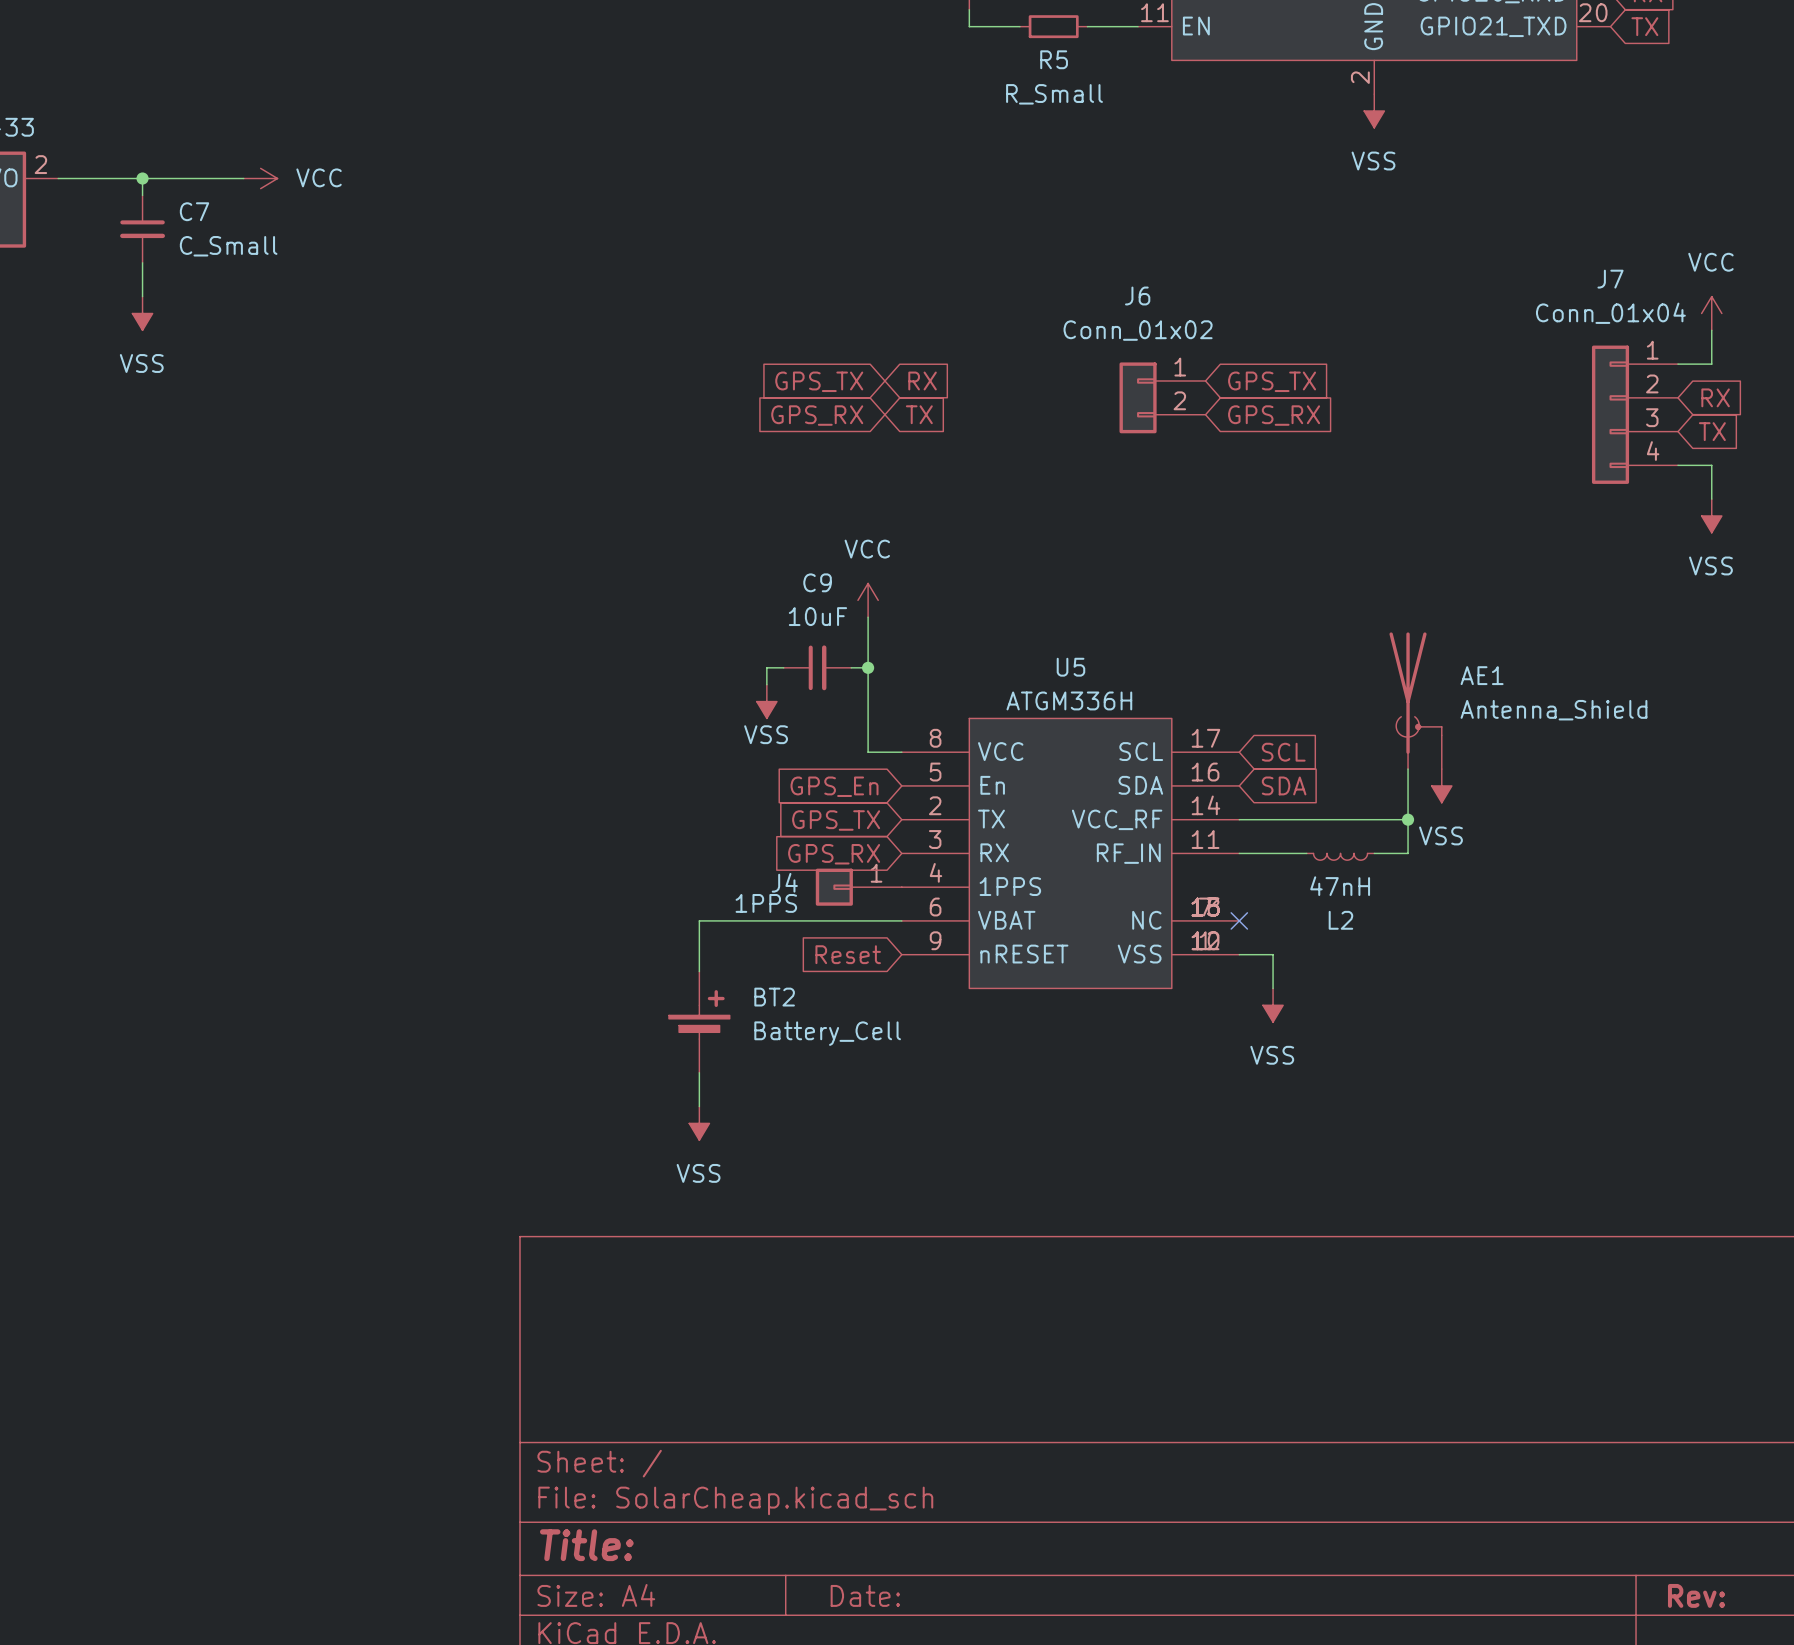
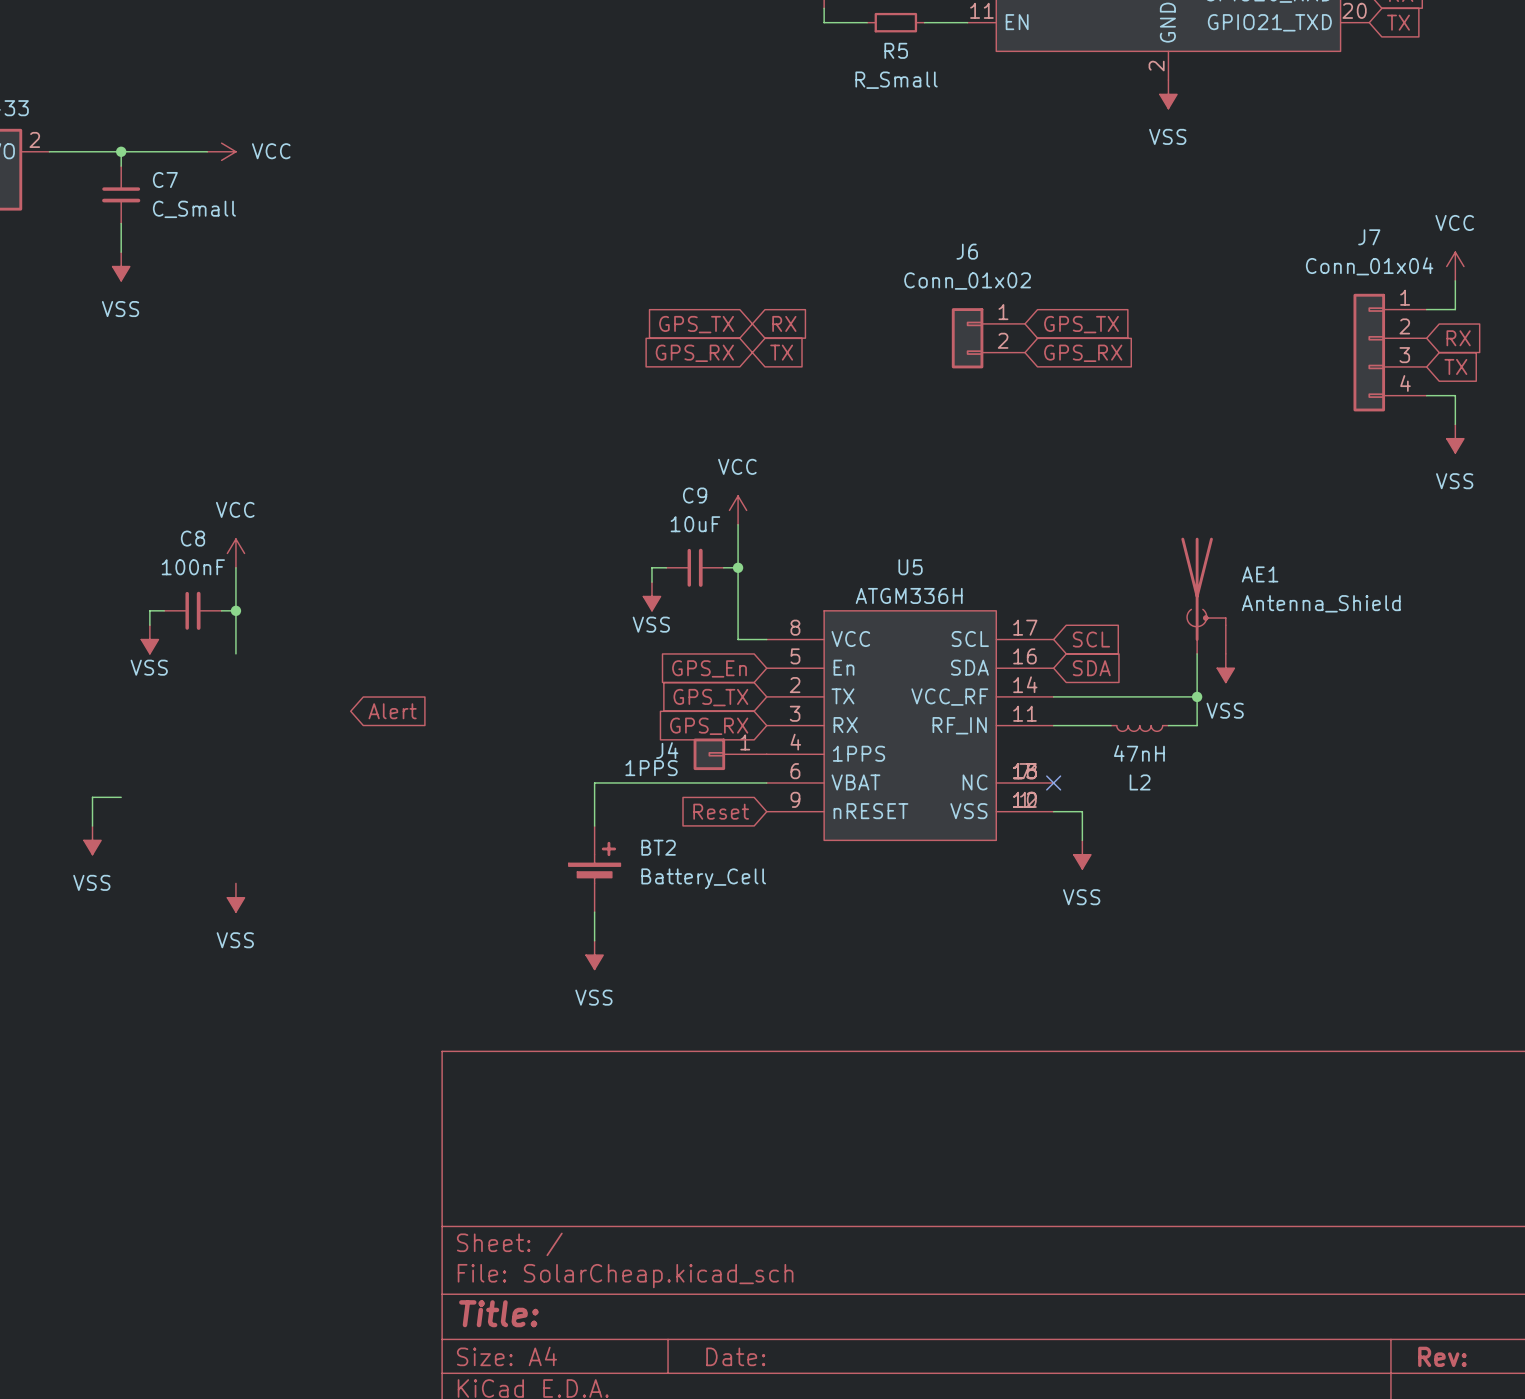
power symbol: none -> VCC (235, 553)
wire: none -> (235, 567) (235, 653)
wire: none -> (164, 610) (149, 610) (149, 625)
C8: none -> 100nF (192, 610)
wire: none -> (221, 610) (235, 610)
junction: none -> (235, 610)
power symbol: none -> VSS (149, 639)
global label: none -> Alert (392, 711)
wire: none -> (121, 797) (92, 797) (92, 826)
power symbol: none -> VSS (92, 840)
power symbol: none -> VSS (235, 897)

